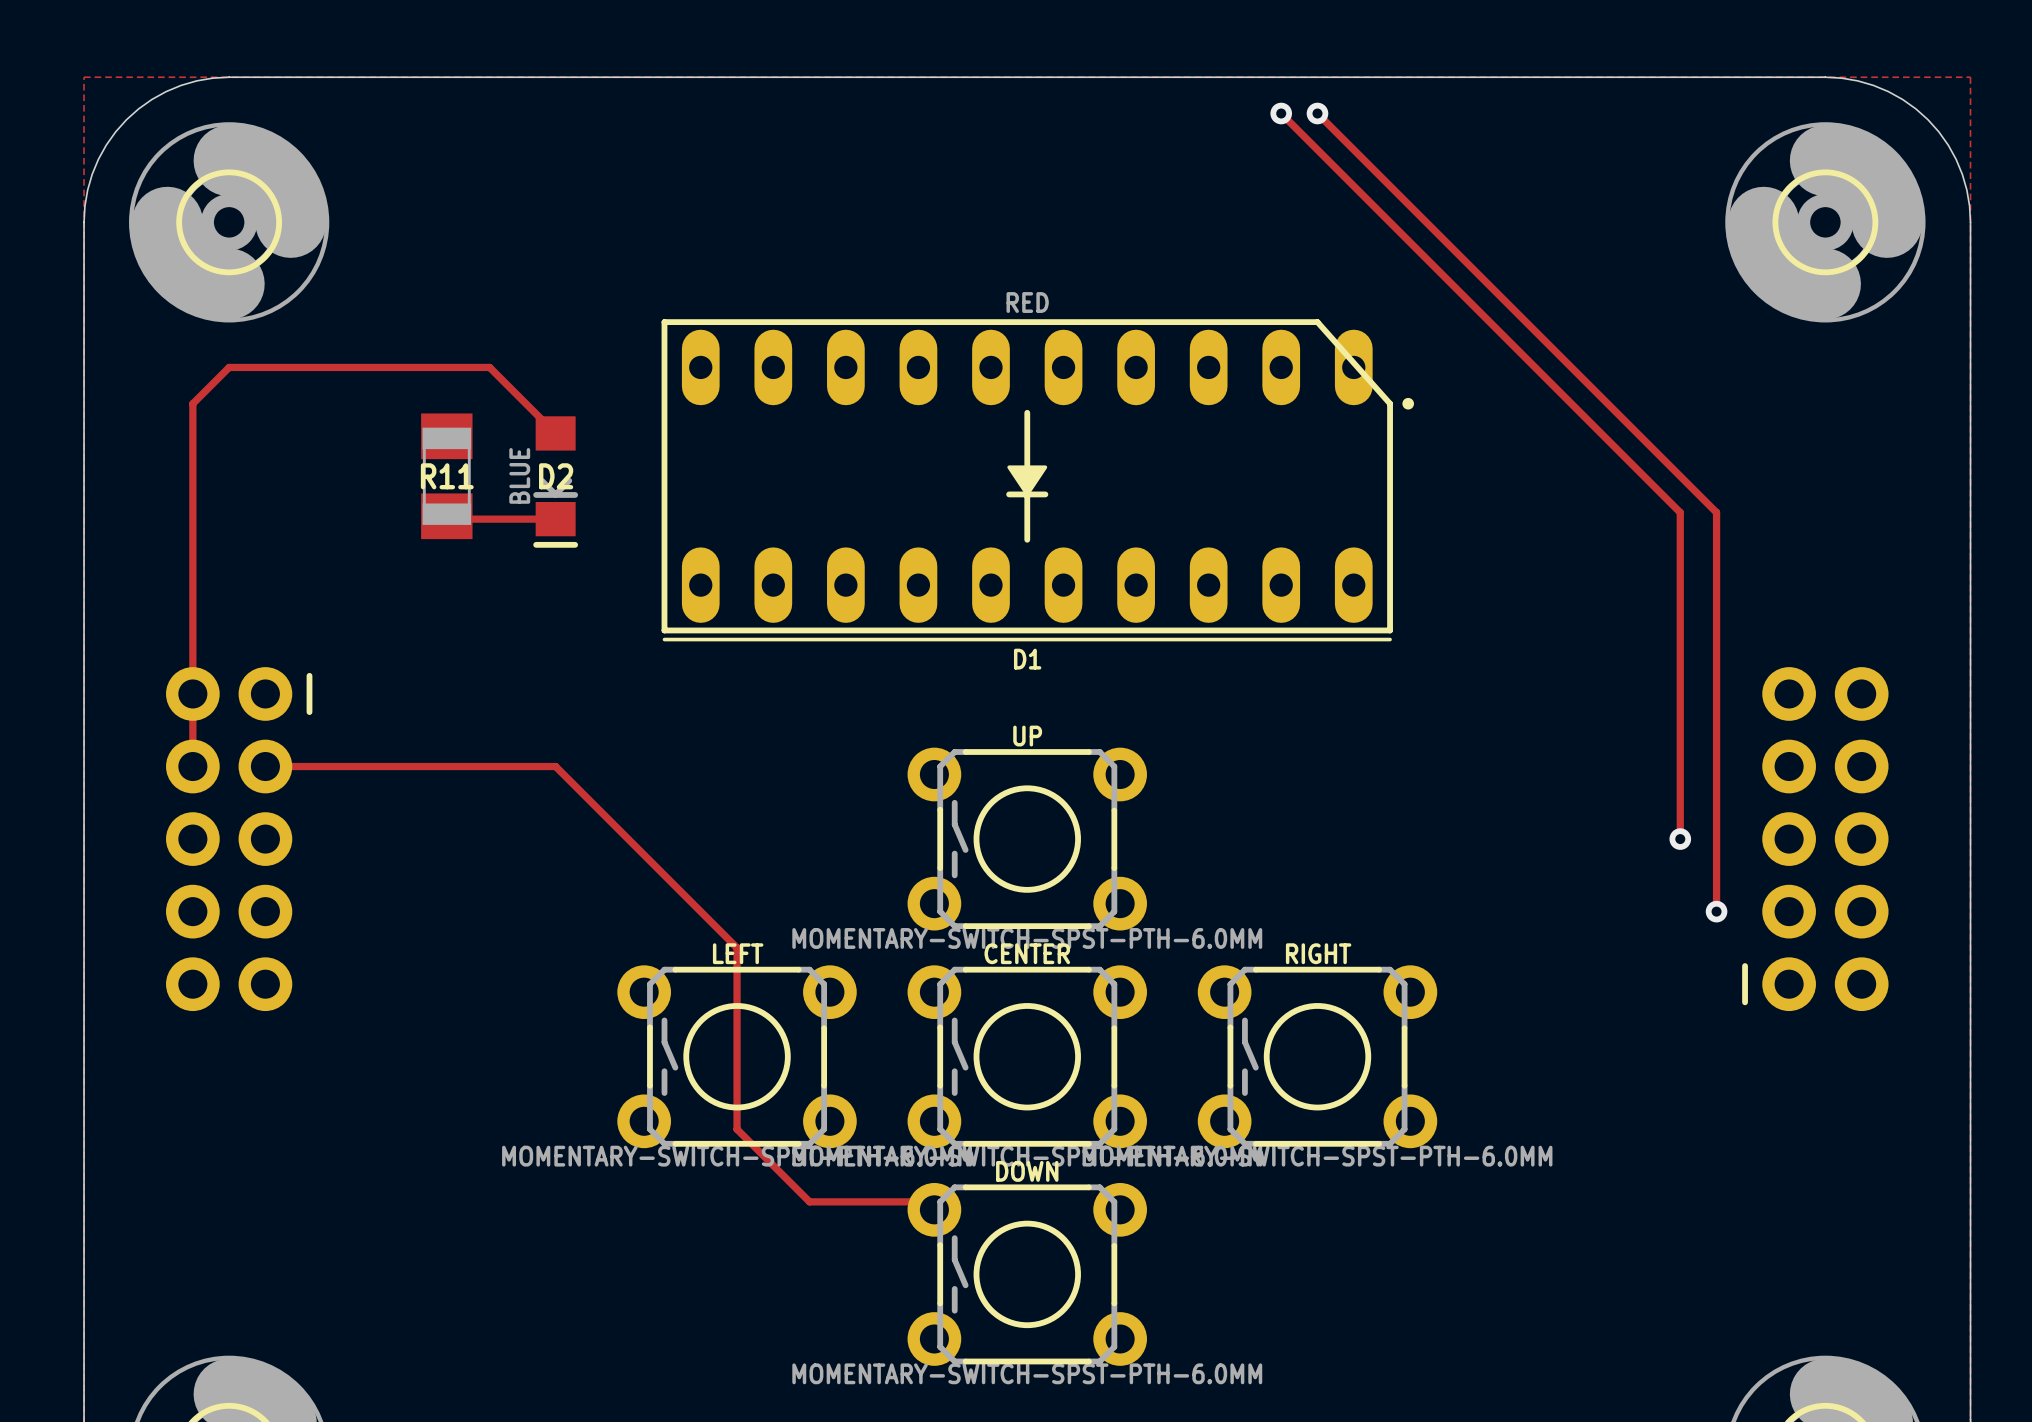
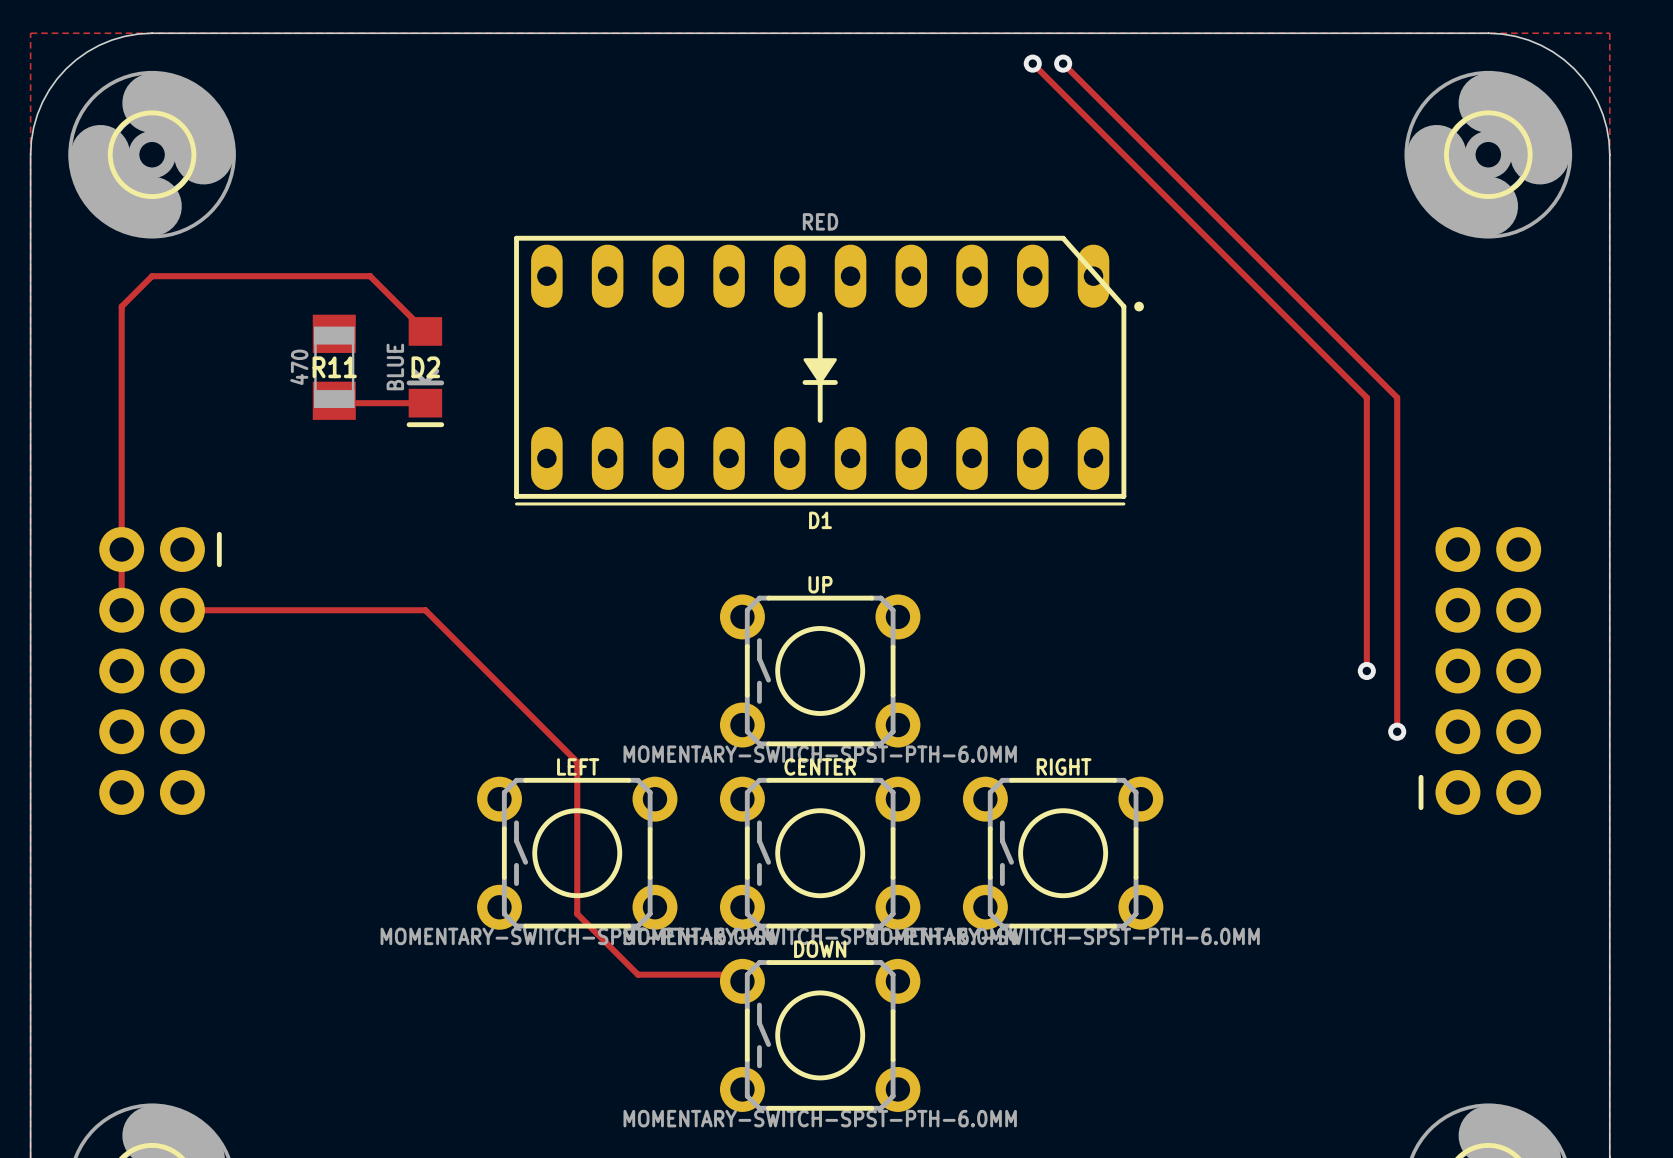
R11 value: none -> 470 (299, 367)

